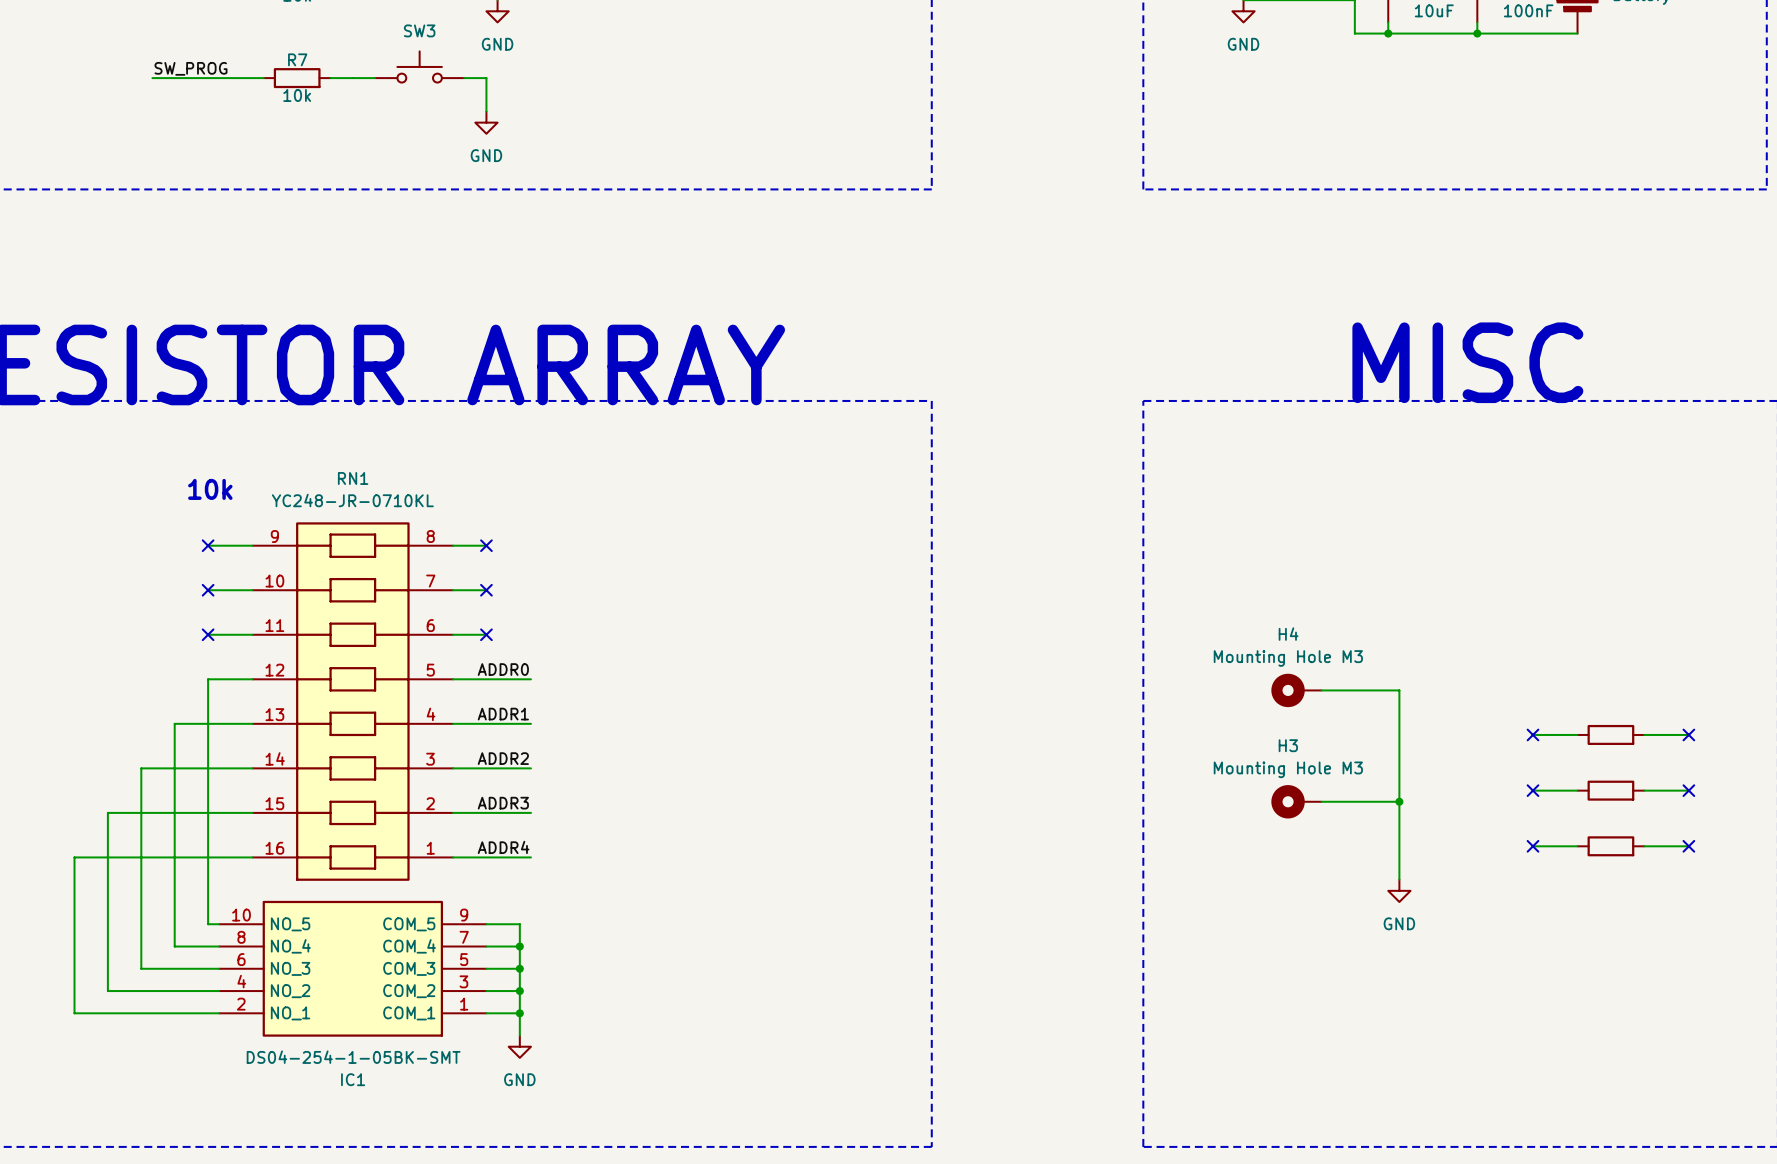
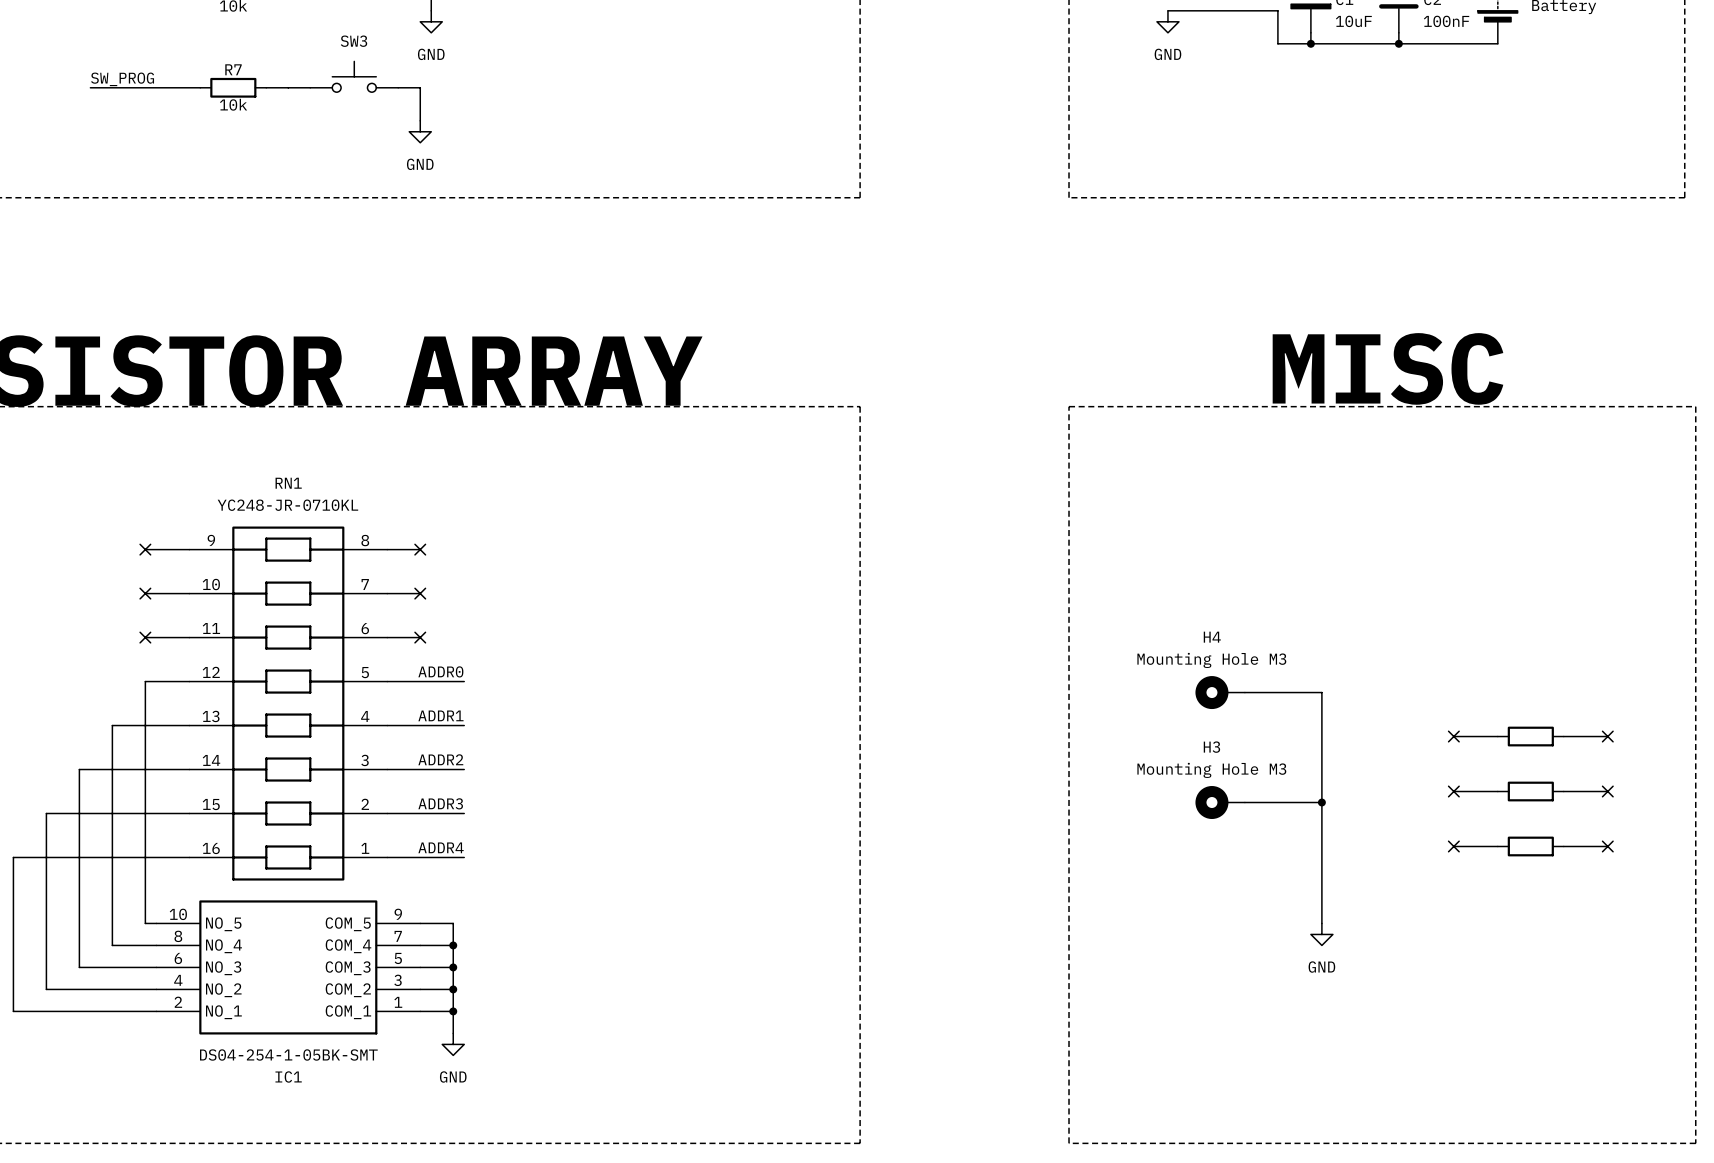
text: 10k (210, 489) -> none
wire: none -> (1321, 879) (1321, 923)
power symbol position: GND (1399, 890) -> GND (1321, 934)

